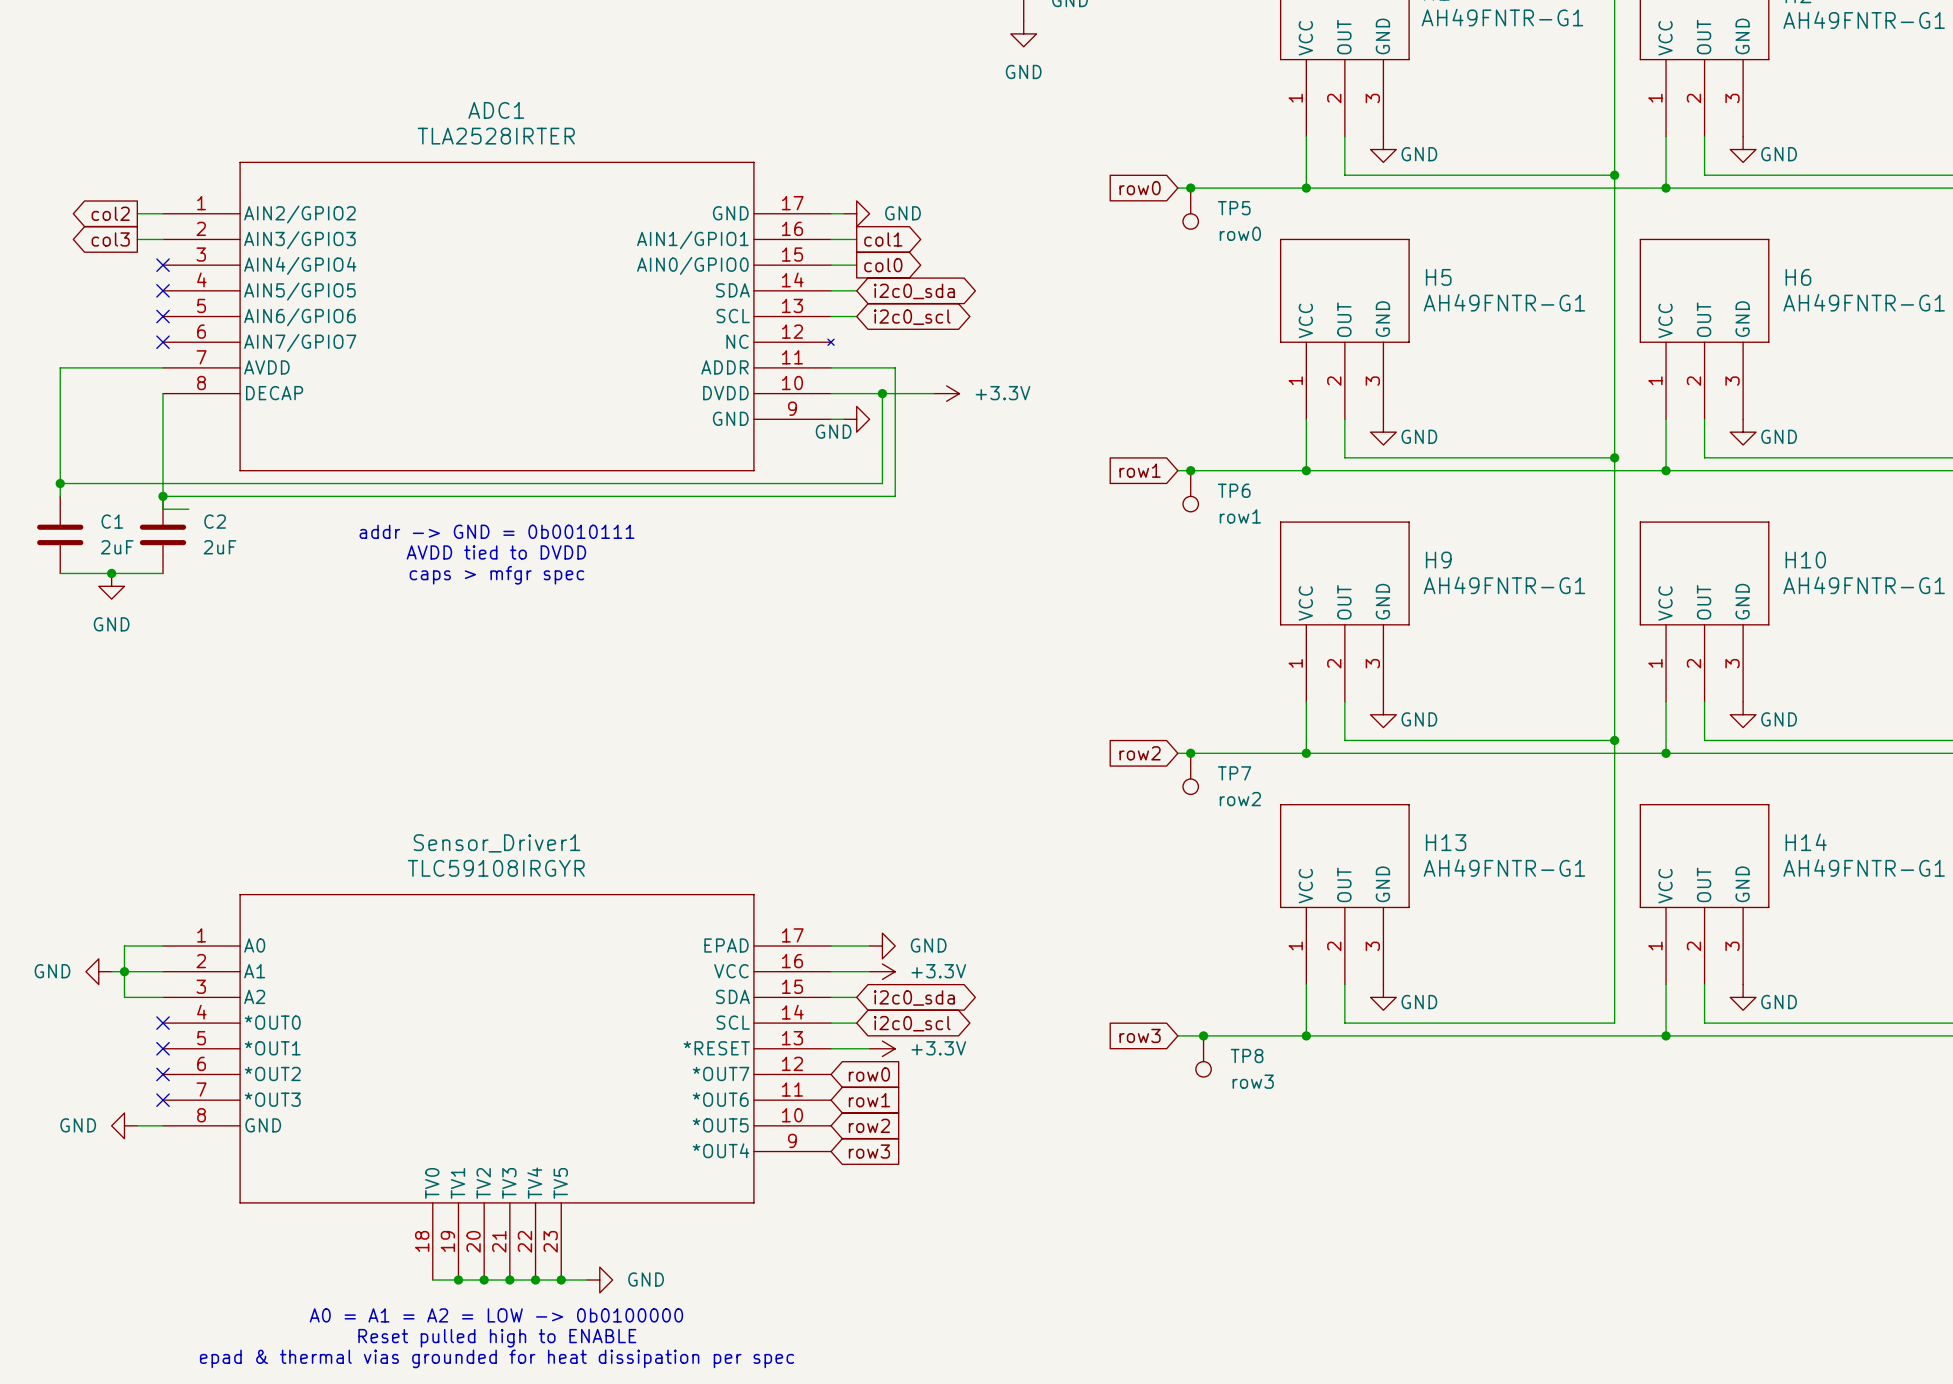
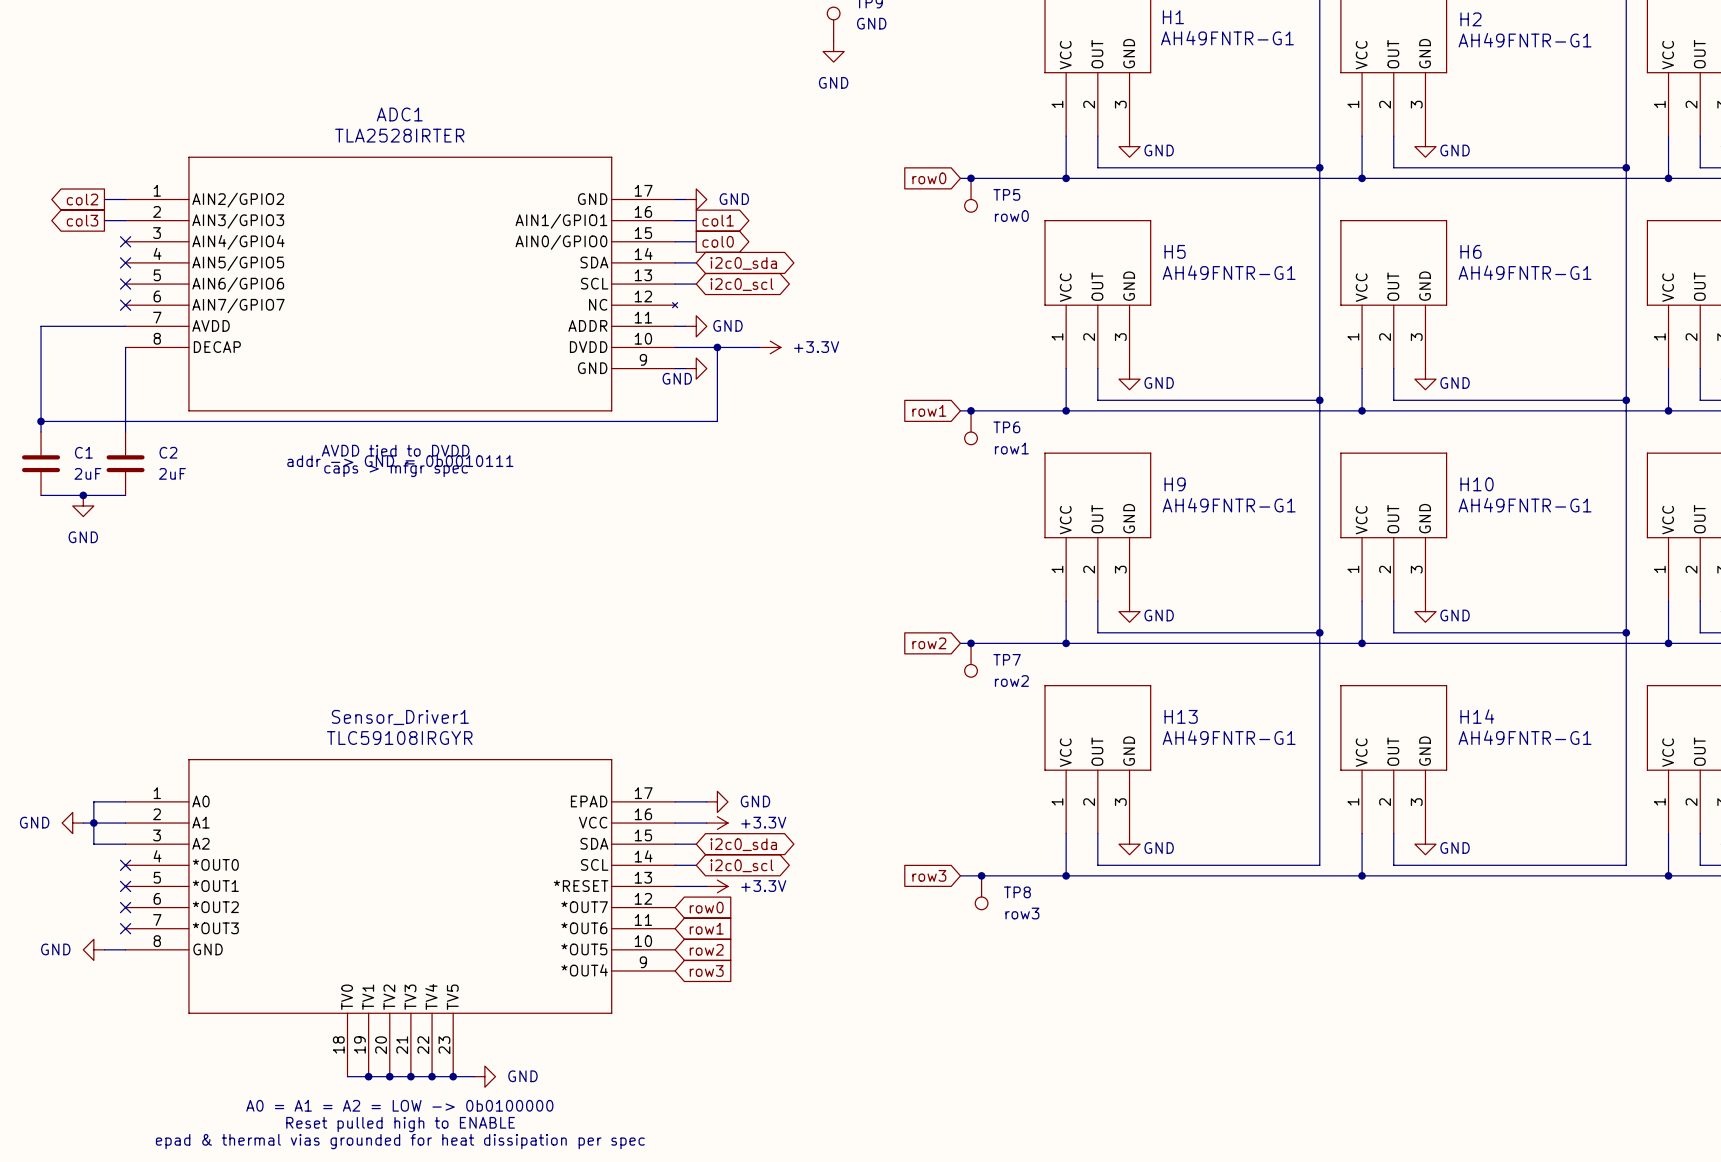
wire: (843, 367) (895, 367) (895, 496) (163, 496) (163, 509) (188, 509) -> none
power symbol: none -> GND (696, 326)
junction: (163, 496) -> none
text position: AVDD tied to DVDD (496, 552) -> AVDD tied to DVDD (395, 450)
text position: caps > mfgr spec (497, 575) -> caps > mfgr spec (396, 469)

